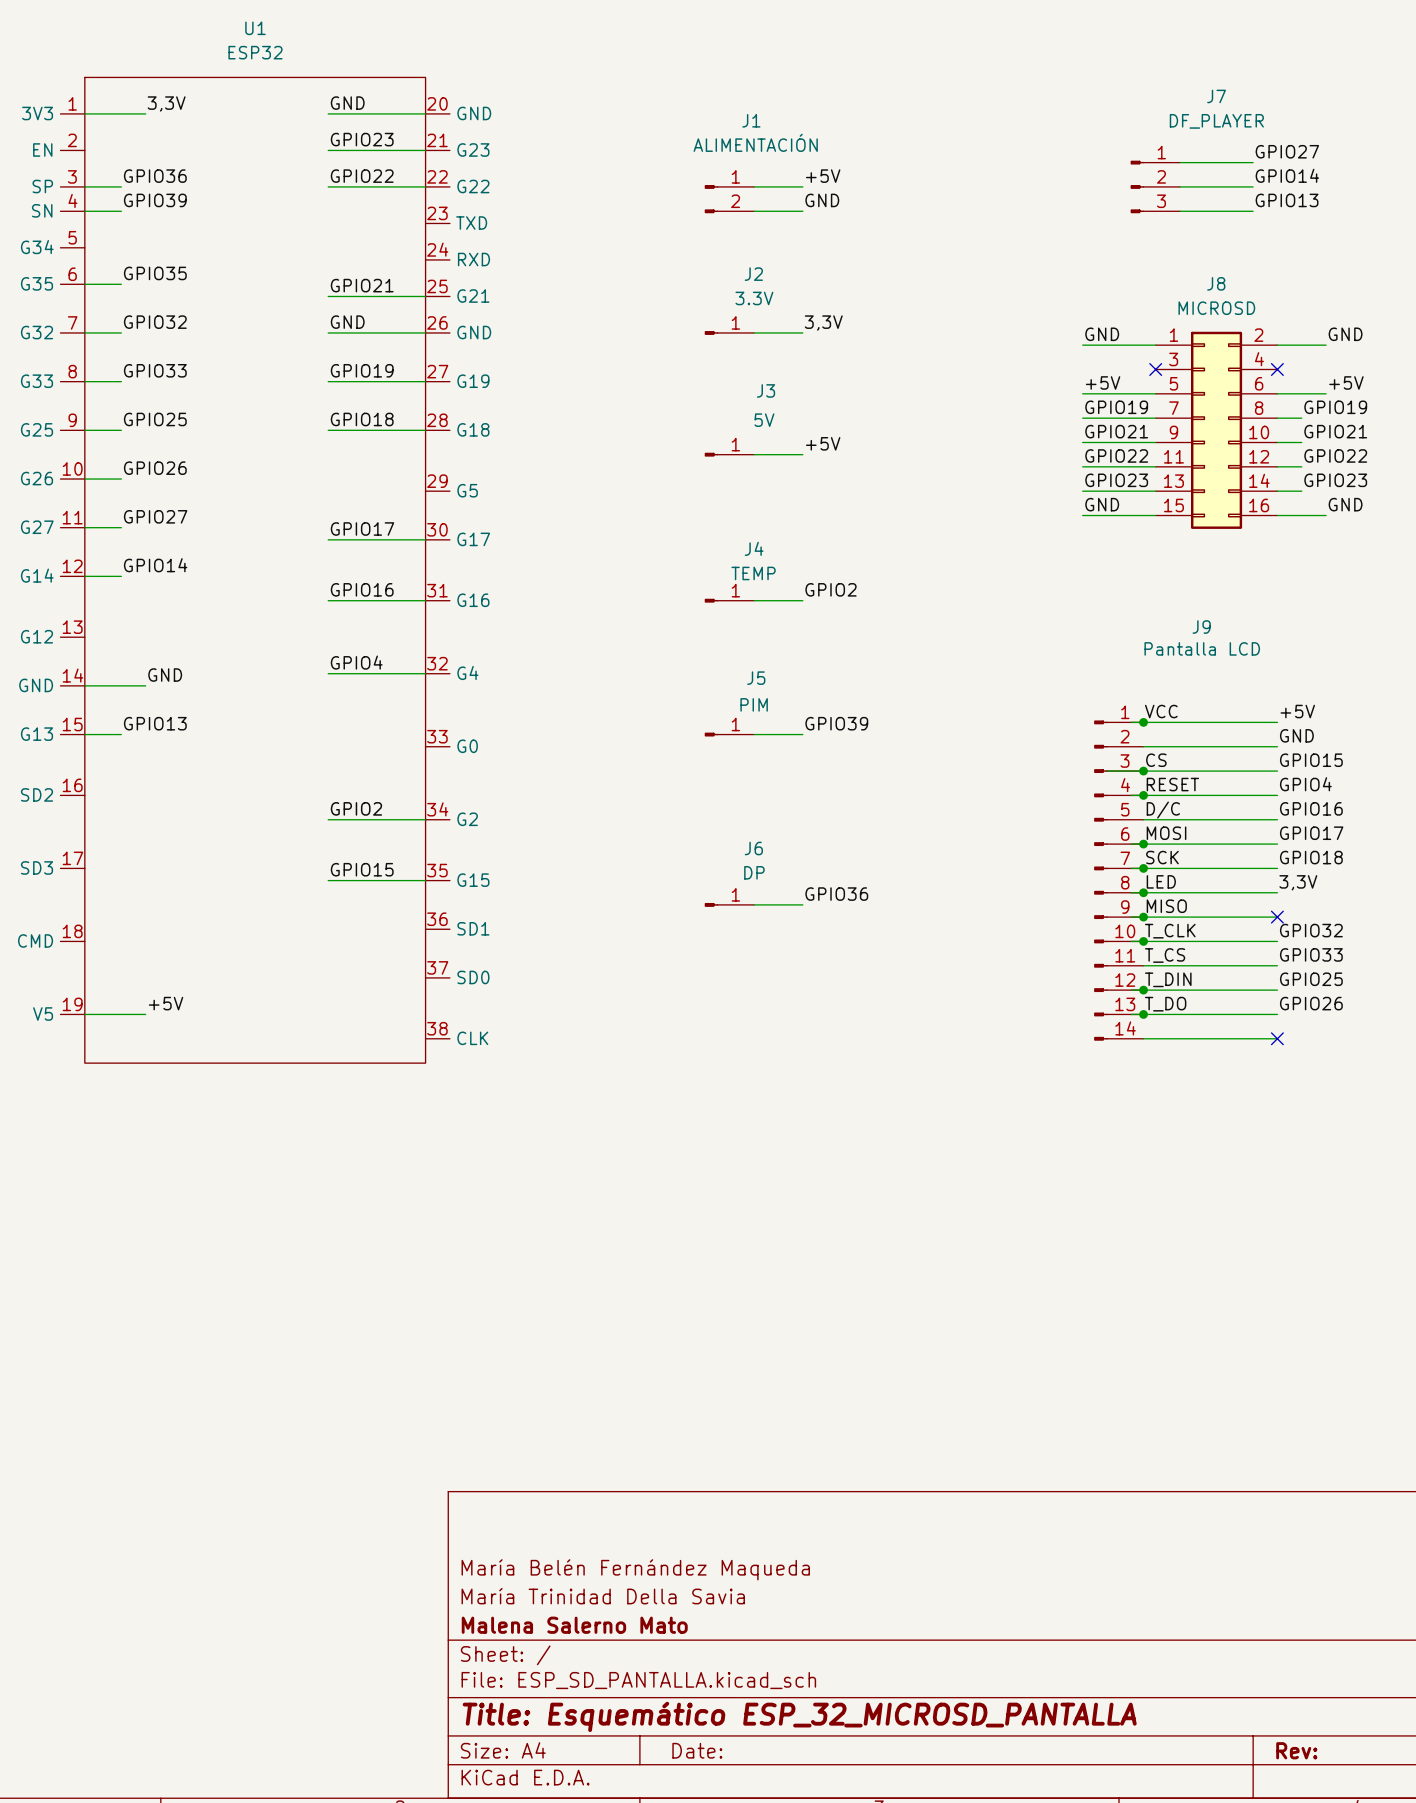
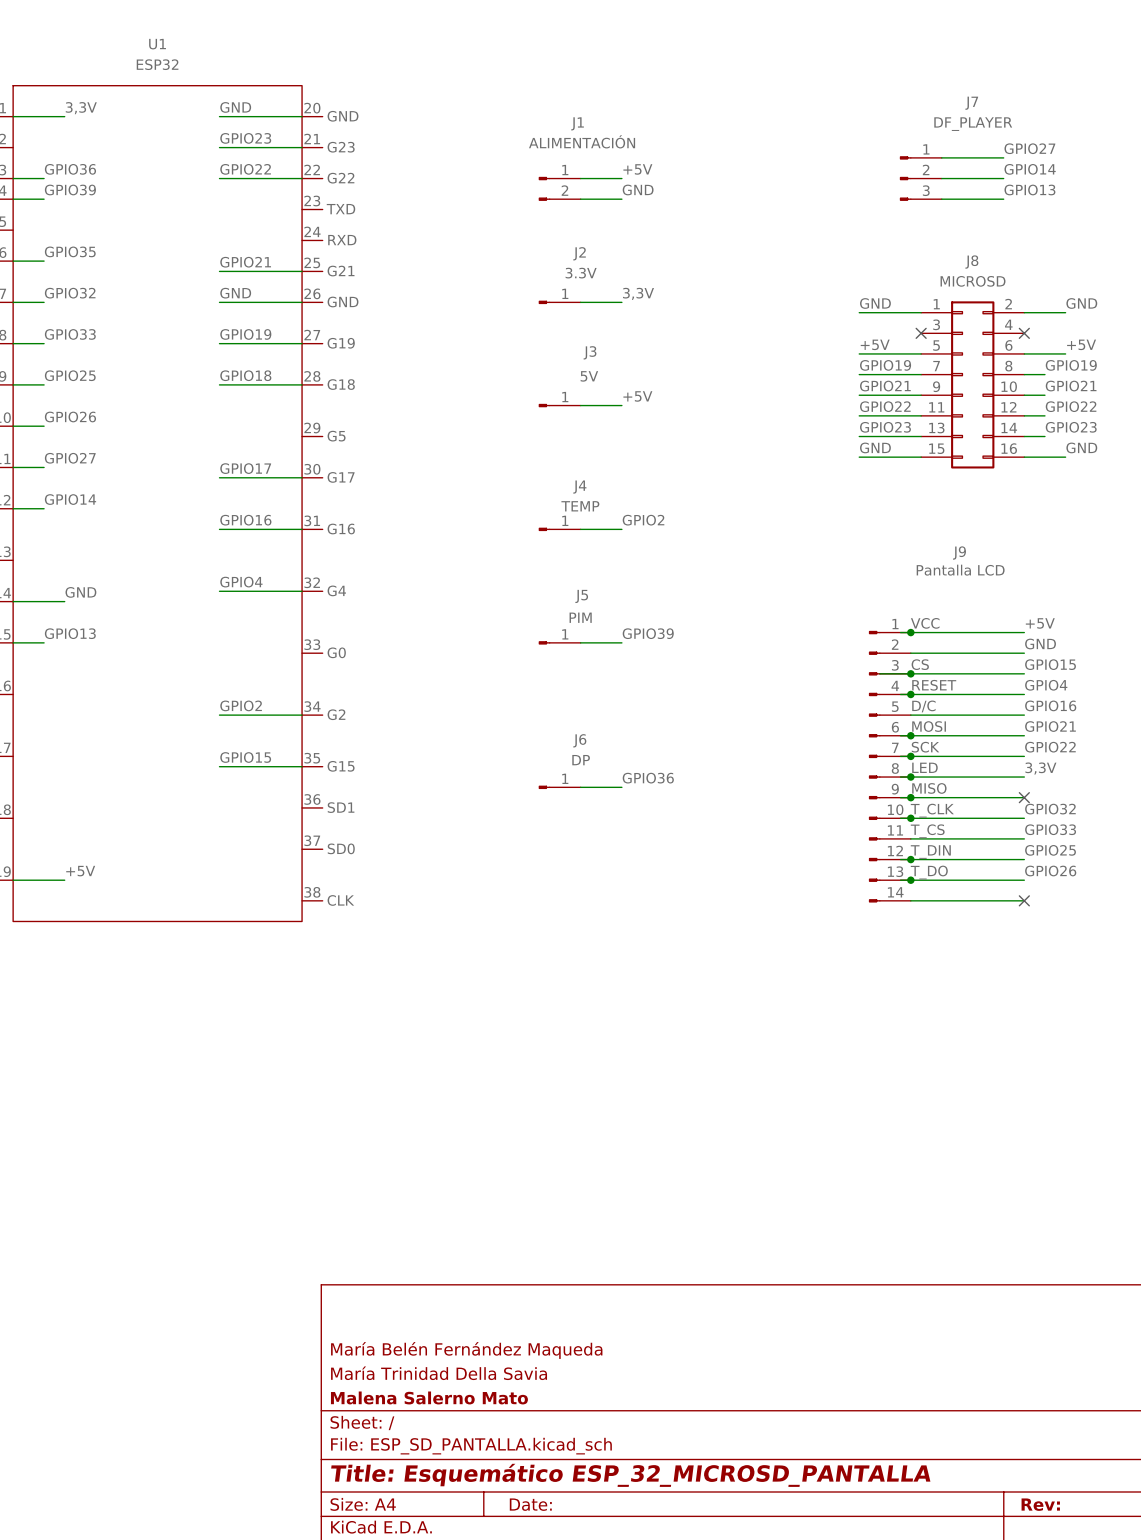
label: GPIO17 (1311, 833) -> GPIO21 (1050, 726)
label: GPIO18 (1311, 857) -> GPIO22 (1050, 747)

